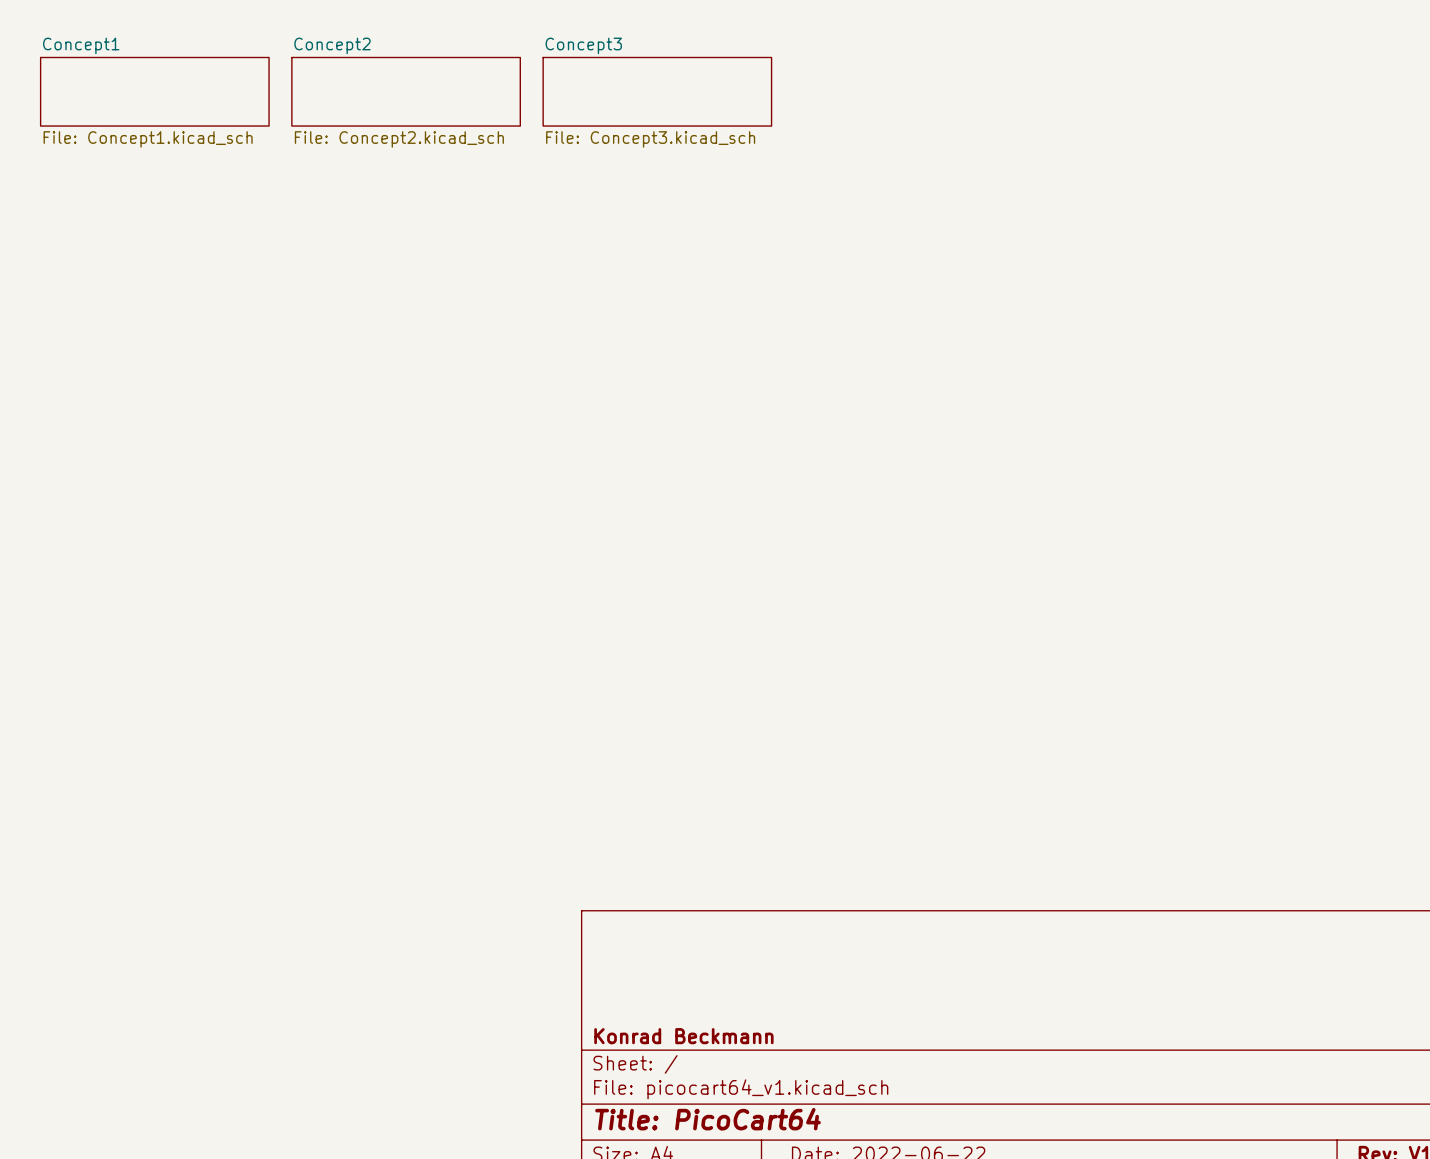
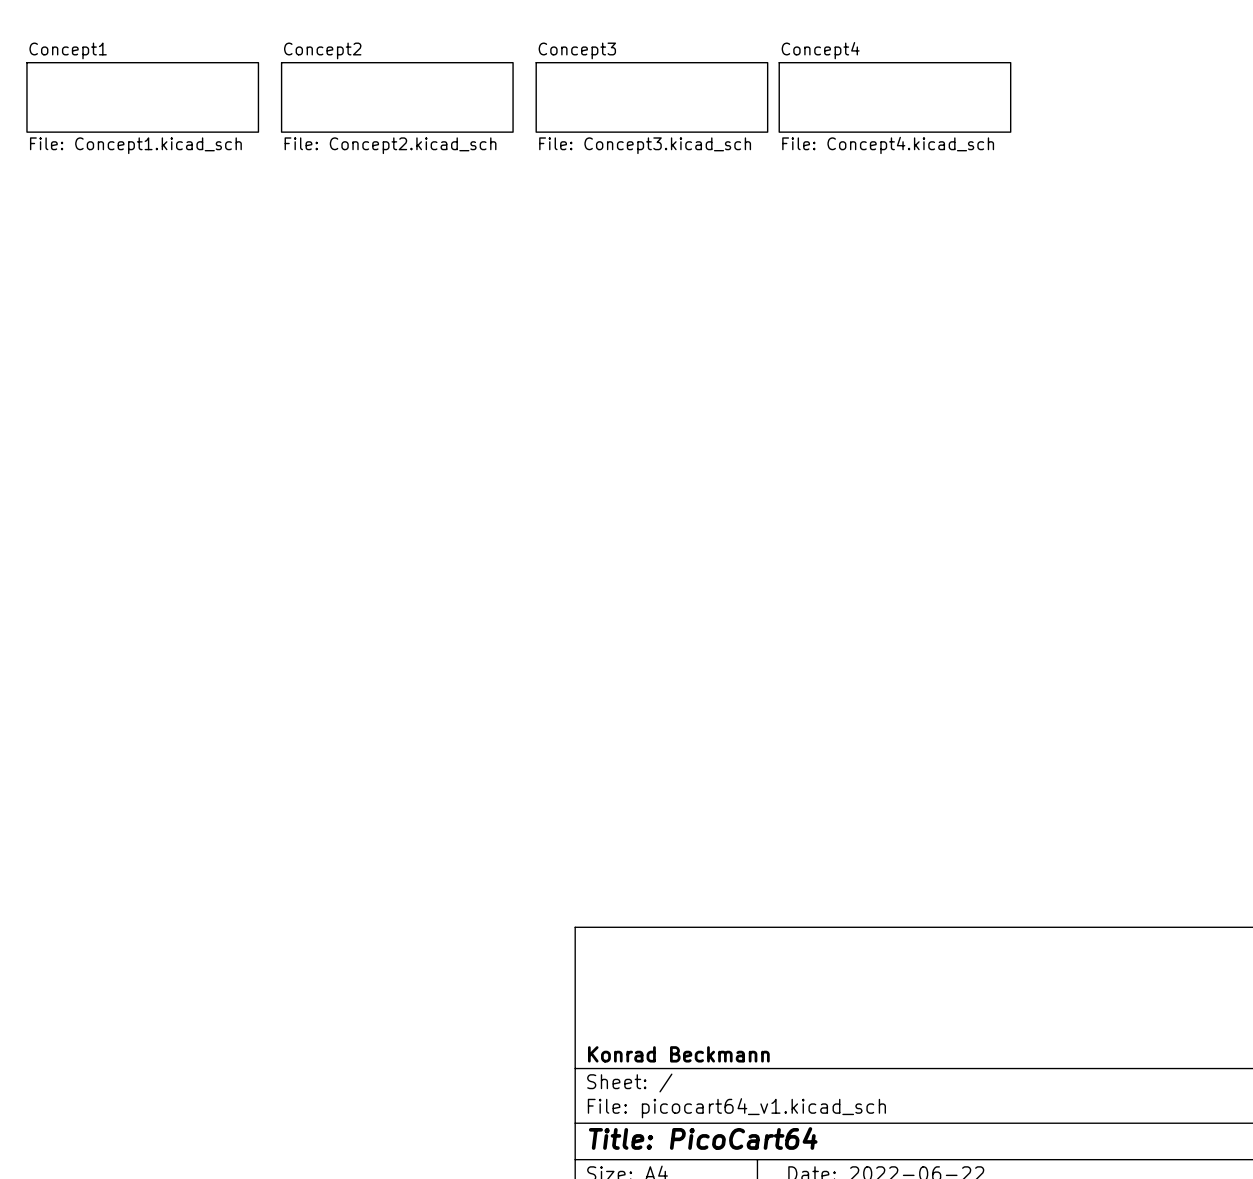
sheet Concept4: none -> File: Concept4.kicad_sch (894, 97)

